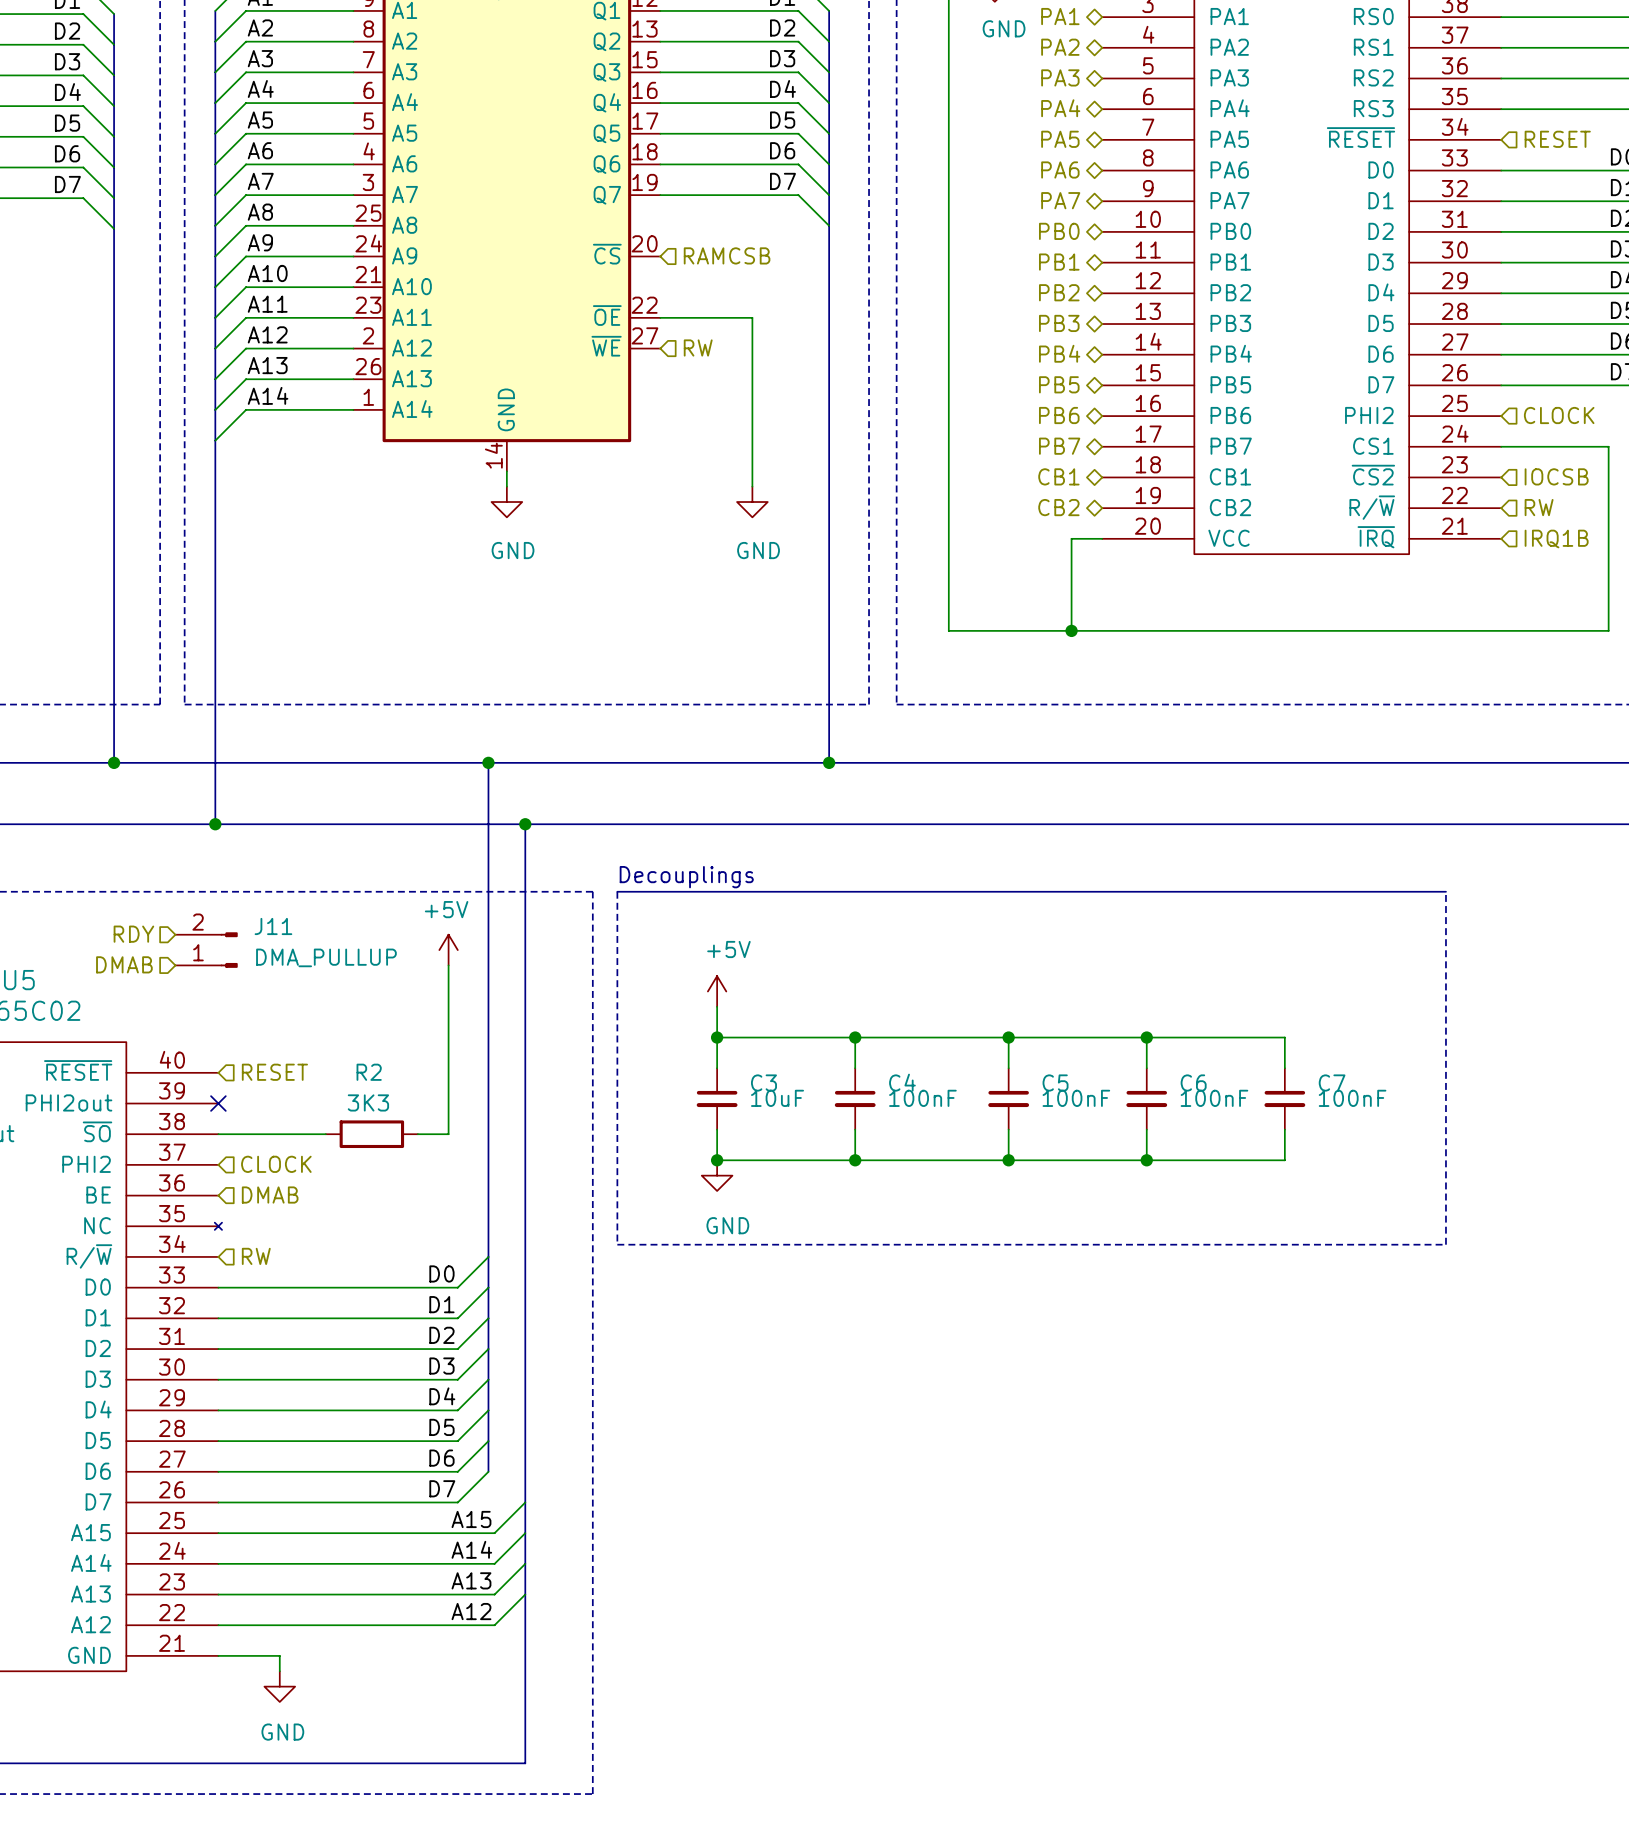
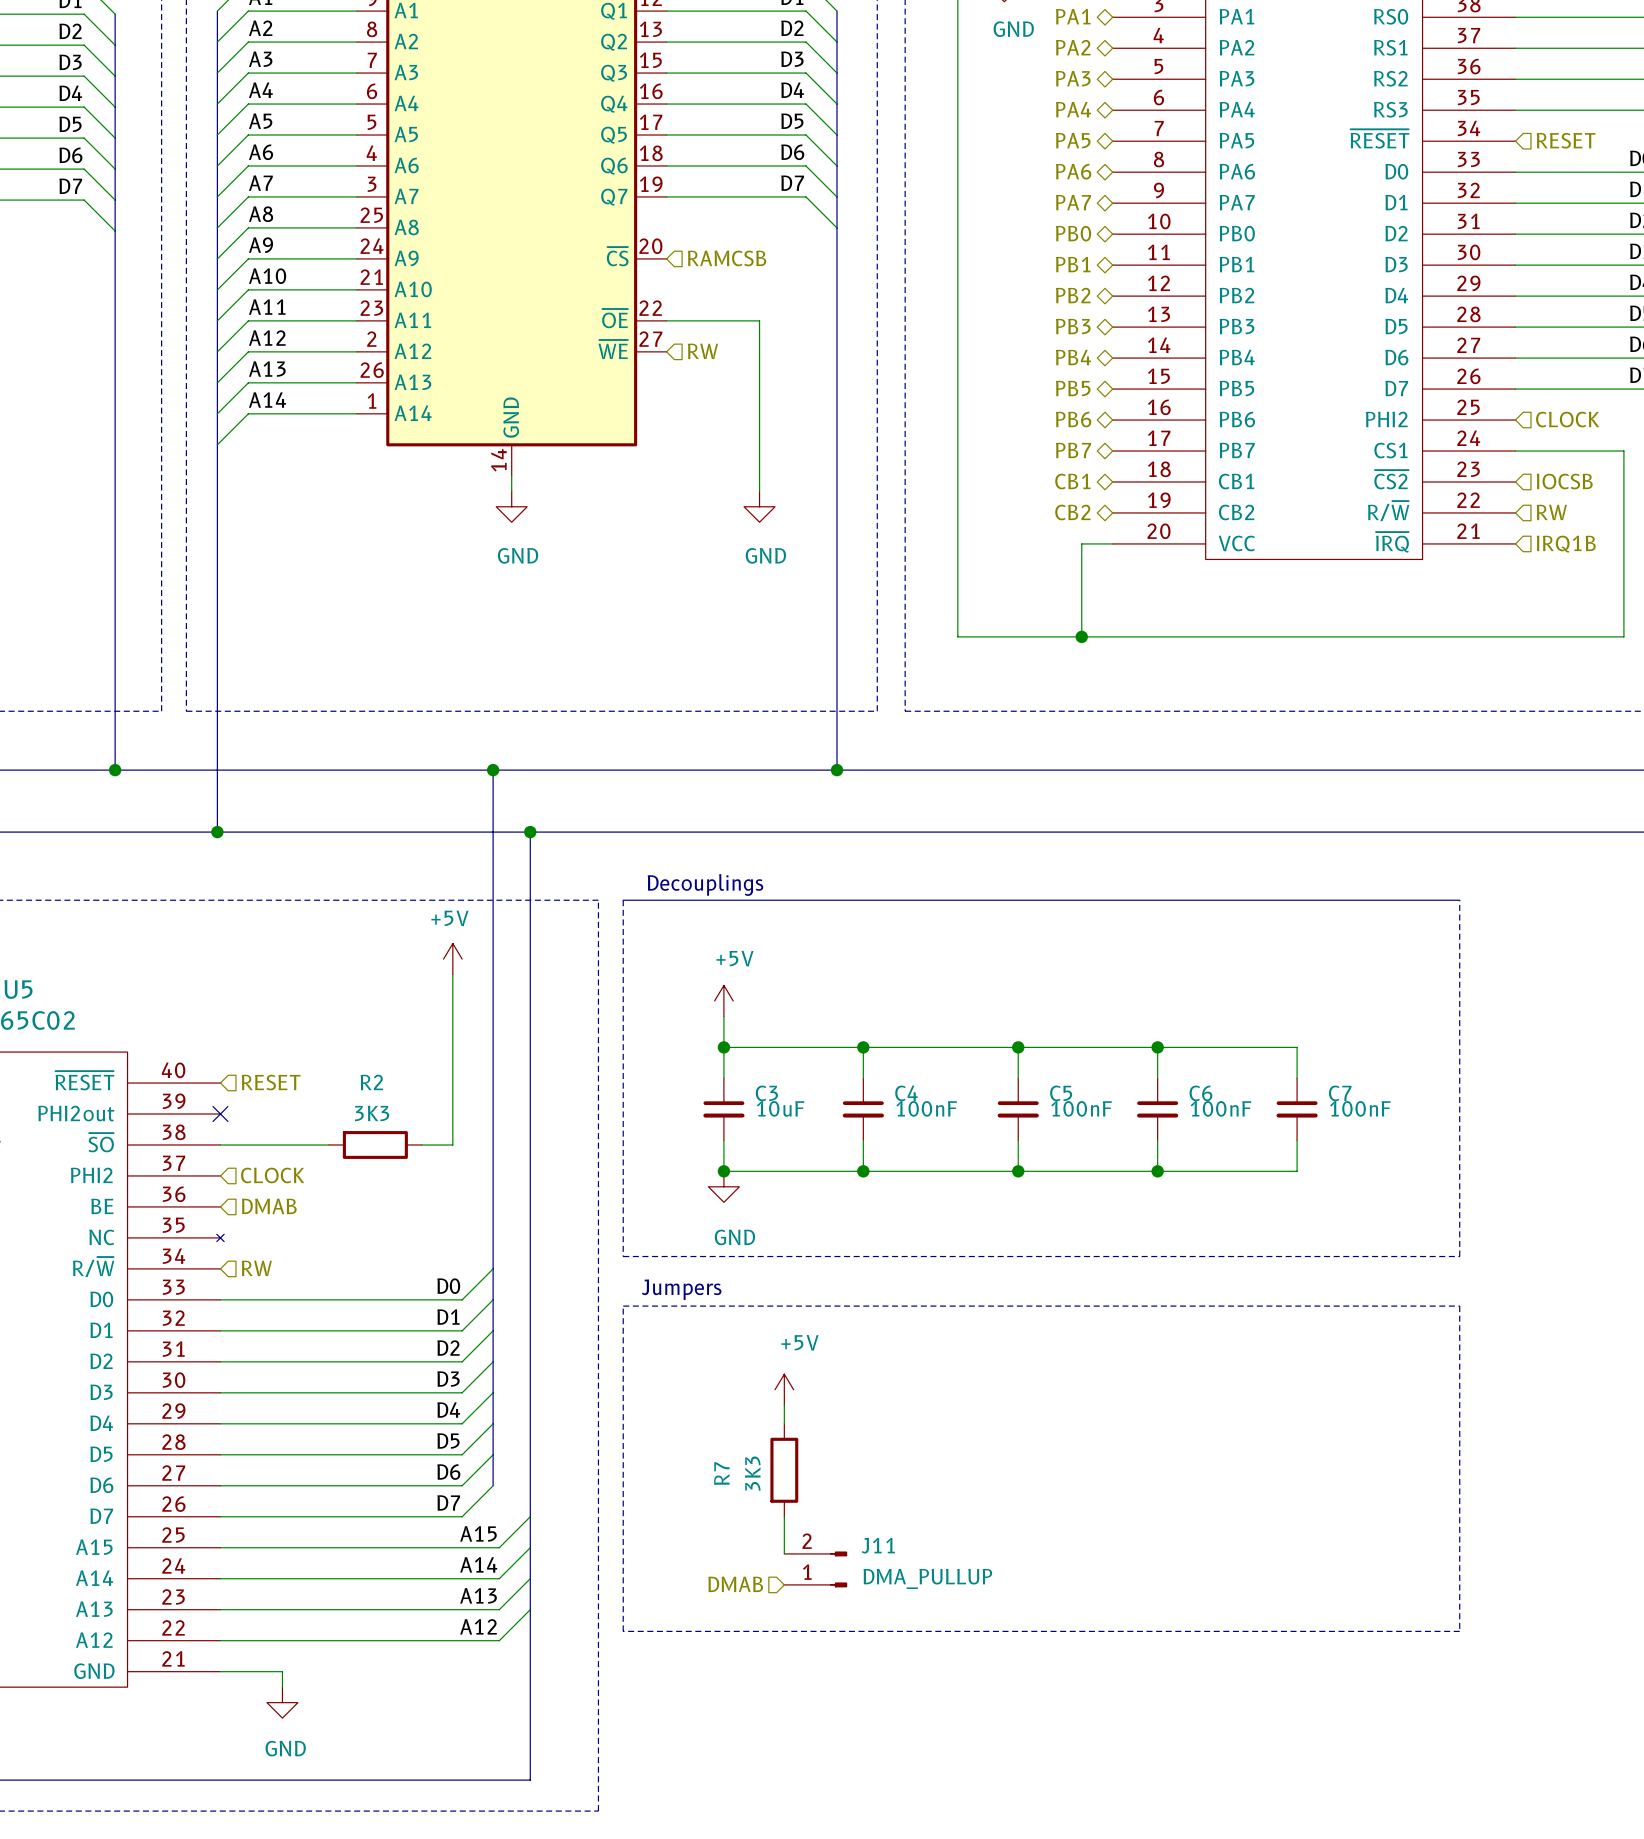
hierarchical label: RDY (133, 934) -> none
J11 position: (206, 950) -> (815, 1569)
hierarchical label: DMAB (124, 964) -> none
text: none -> Jumpers (681, 1289)
line: none -> (623, 1306) (623, 1631) (1459, 1631) (1459, 1306) (623, 1306)
power symbol: none -> +5V (784, 1389)
wire: none -> (784, 1405) (784, 1423)
R7: none -> 3K3 (784, 1470)
wire: none -> (784, 1516) (784, 1553)
hierarchical label: none -> DMAB (735, 1584)

